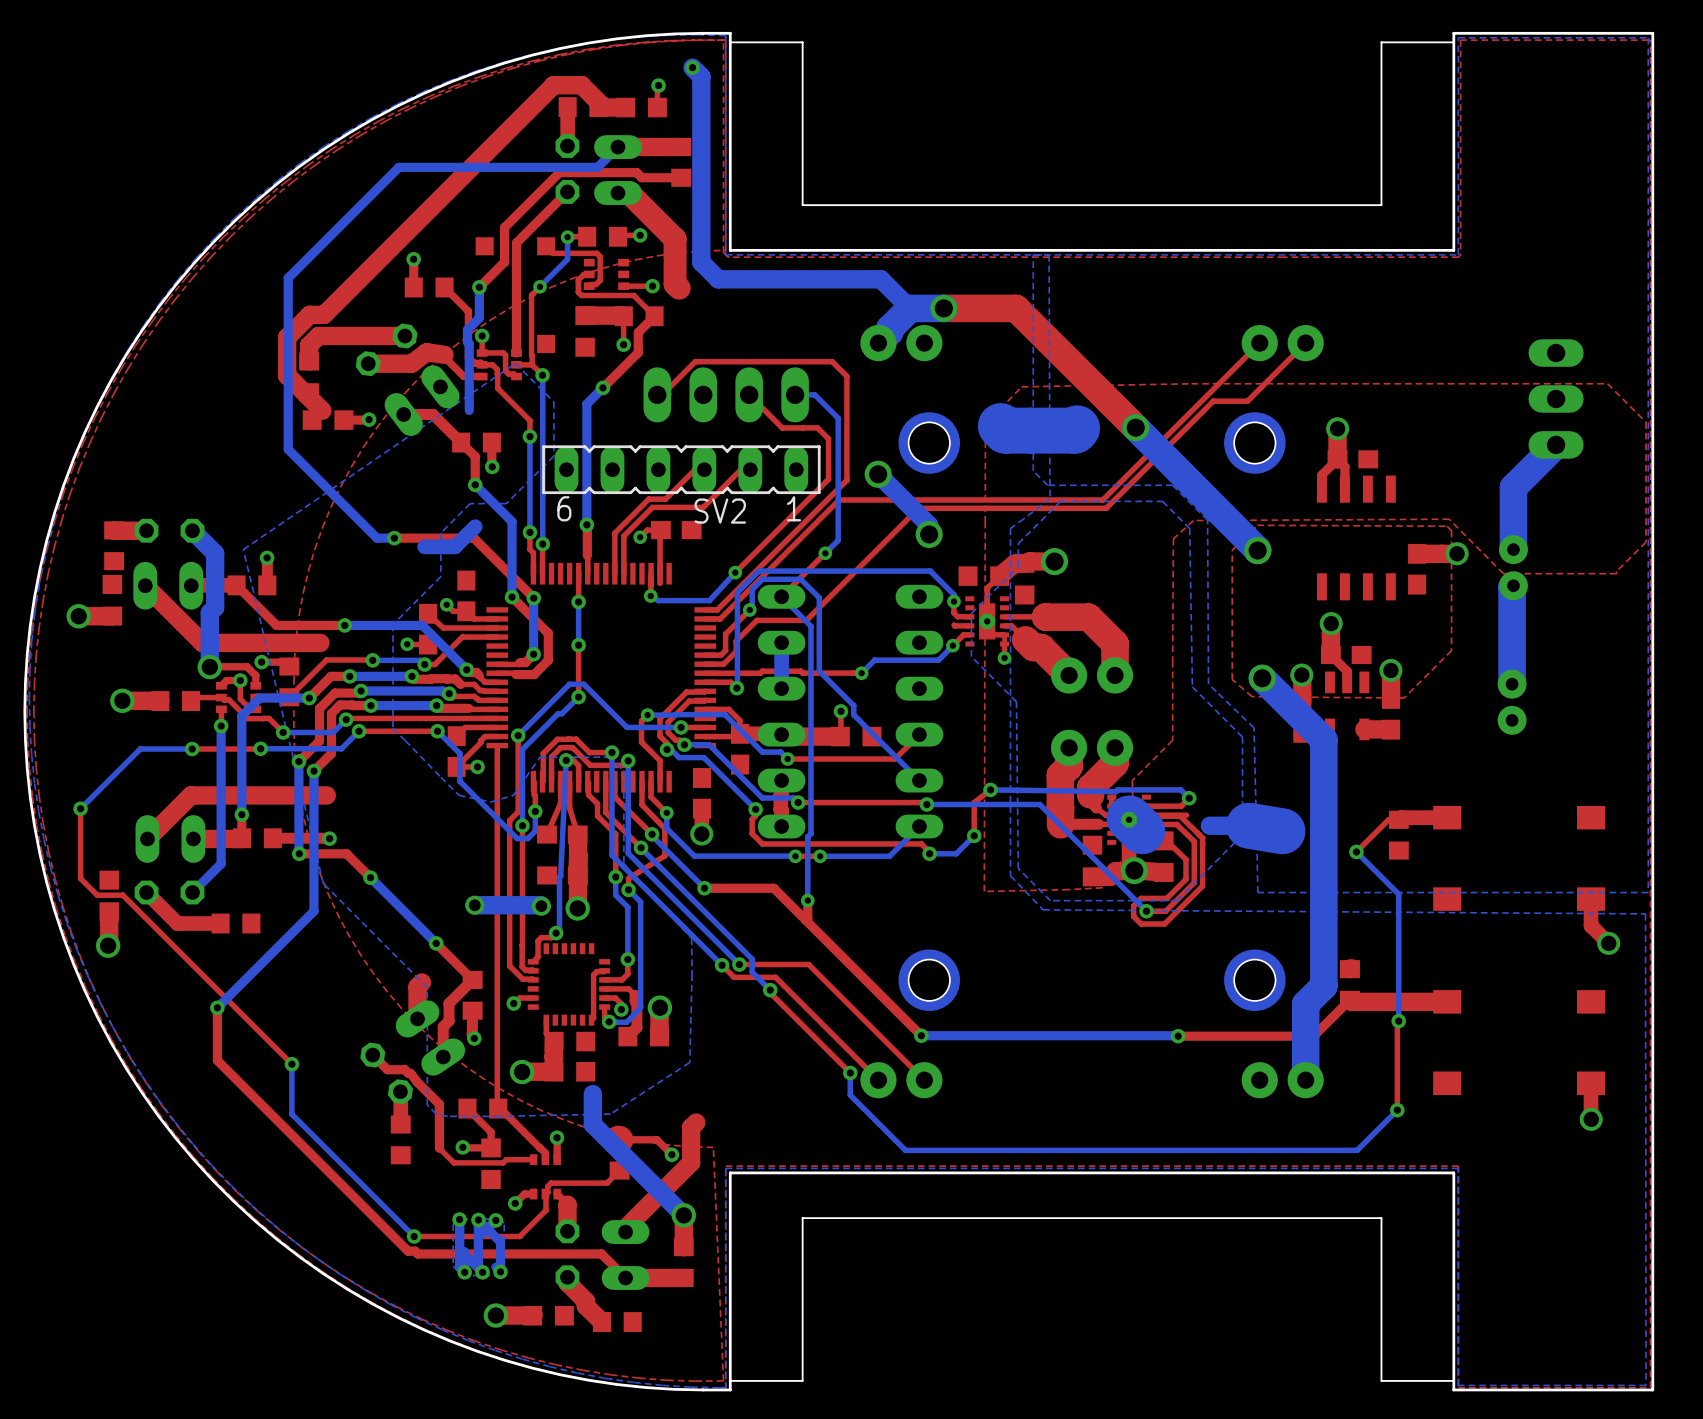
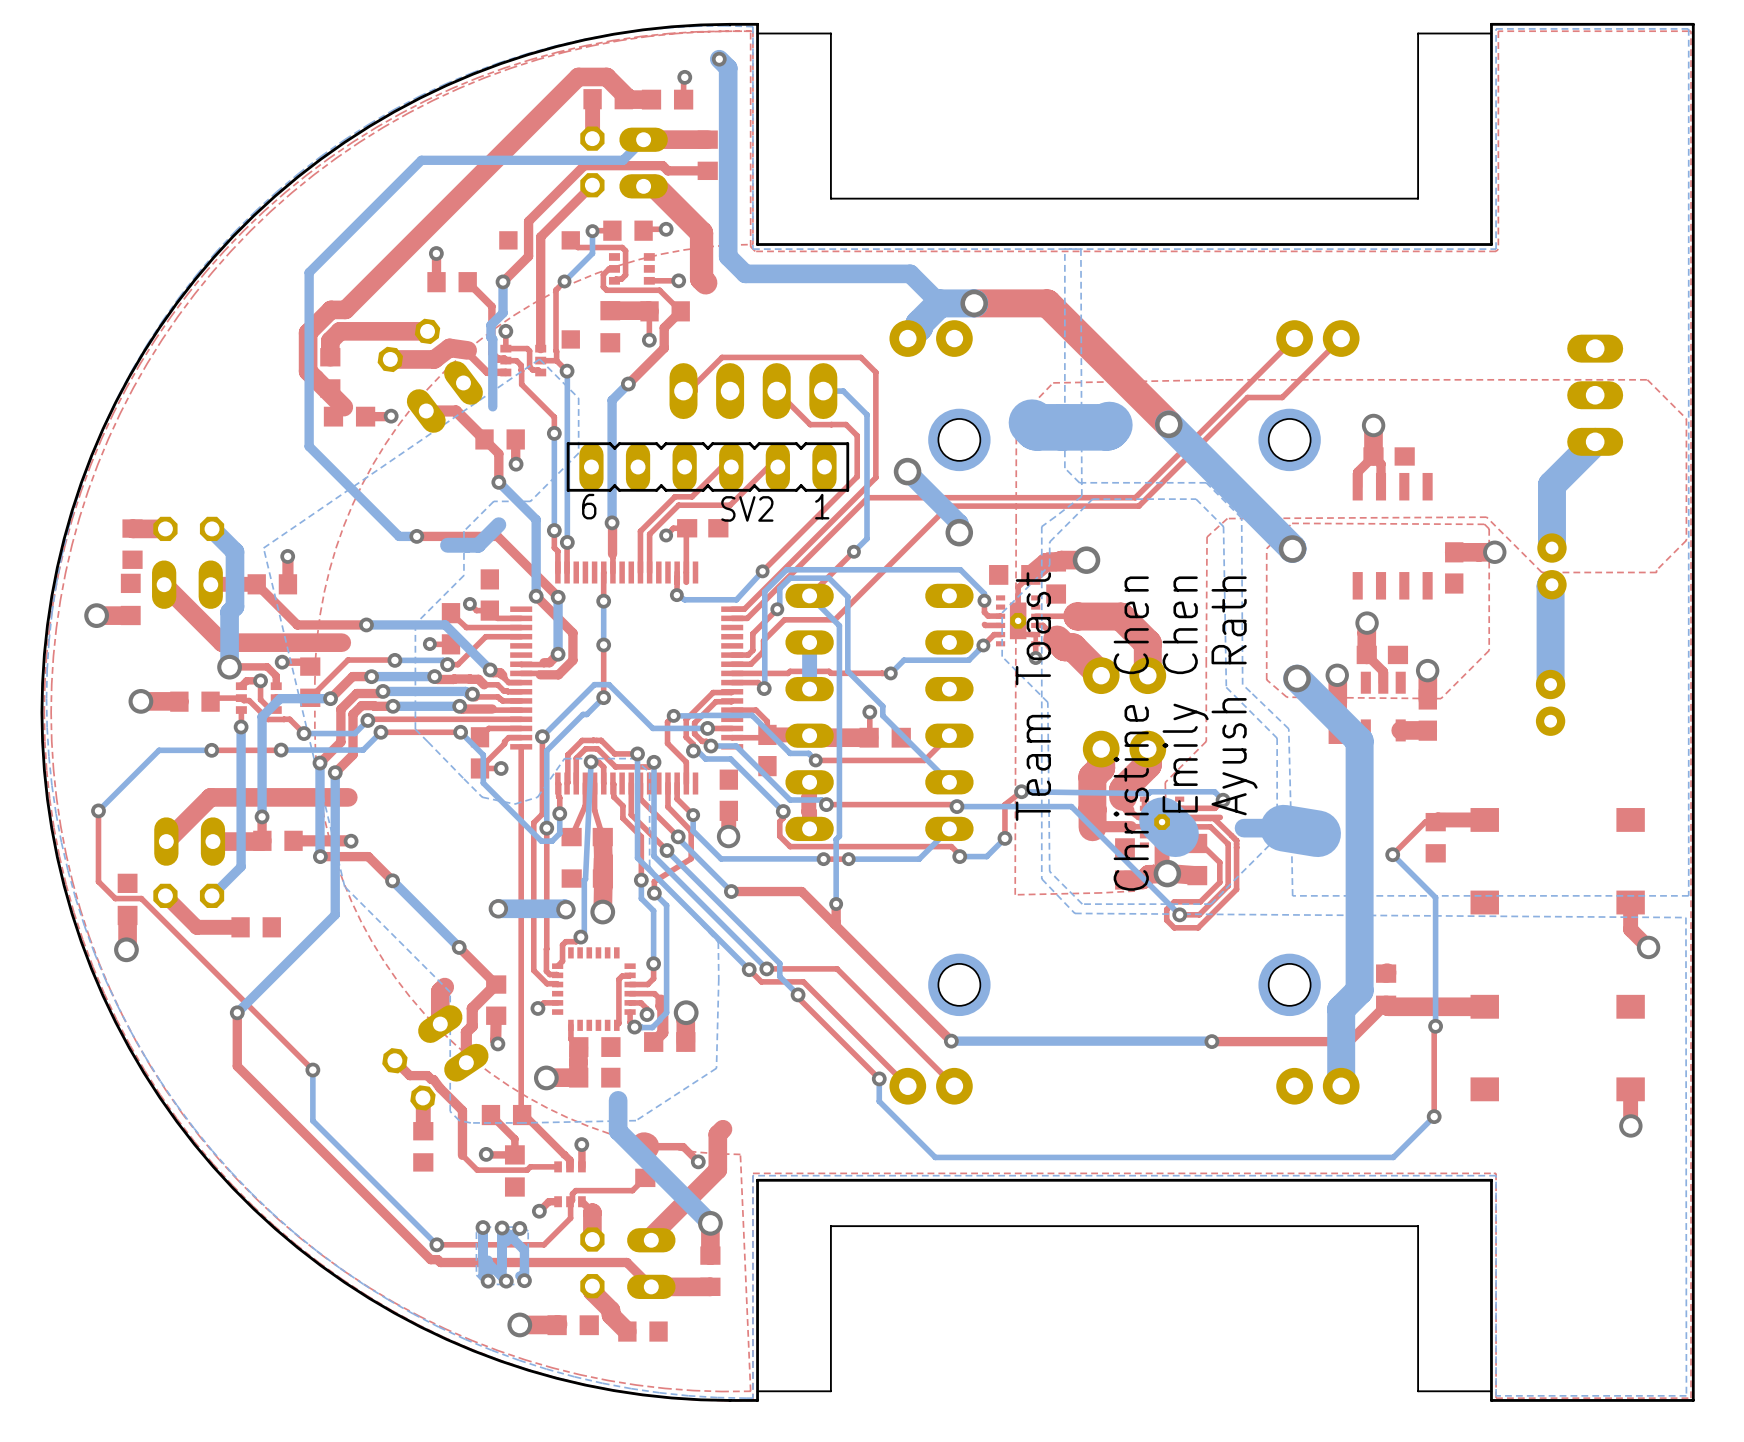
text: none -> Emily Chen (1185, 694)
text: none -> Ayush Rath (1234, 695)
text: none -> Team Toast (1033, 696)
text: none -> Christine Chen (1131, 733)

